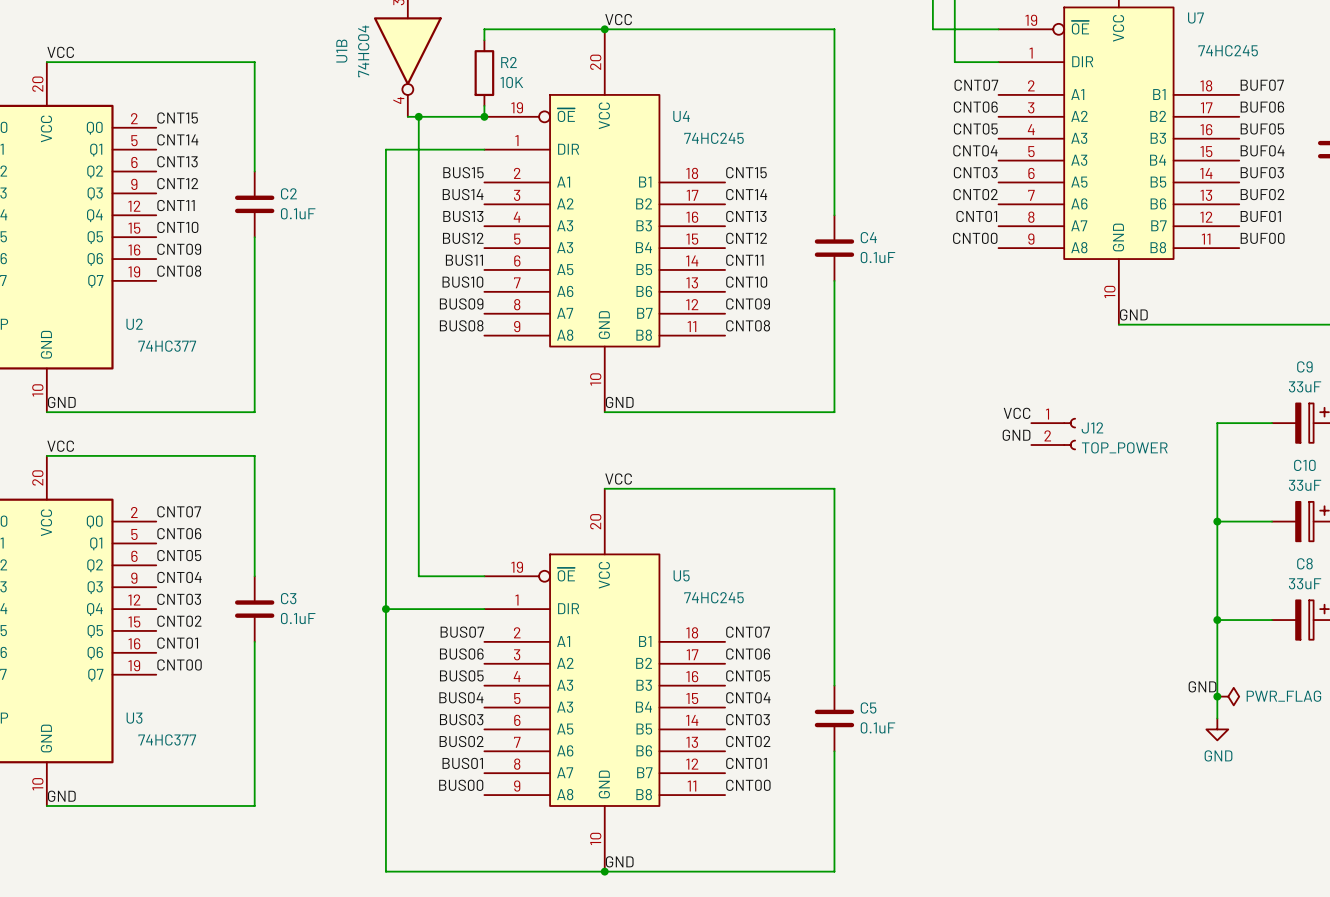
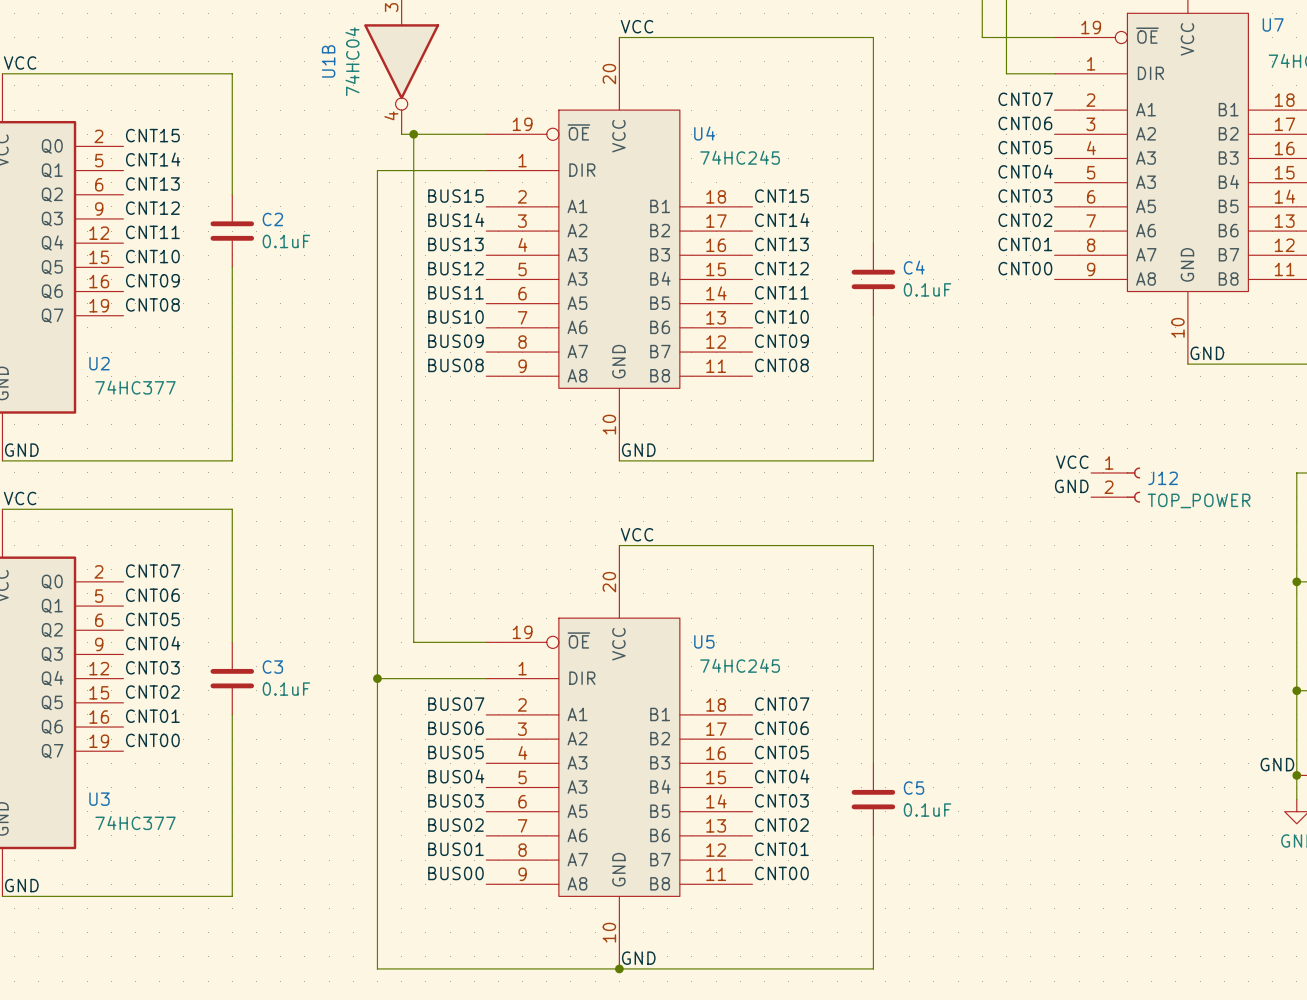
wire: (604, 29) (484, 29) (484, 40) -> none
junction: (604, 29) -> none
R2: 10K (484, 73) -> none
wire: (484, 105) (484, 116) -> none
junction: (484, 116) -> none

